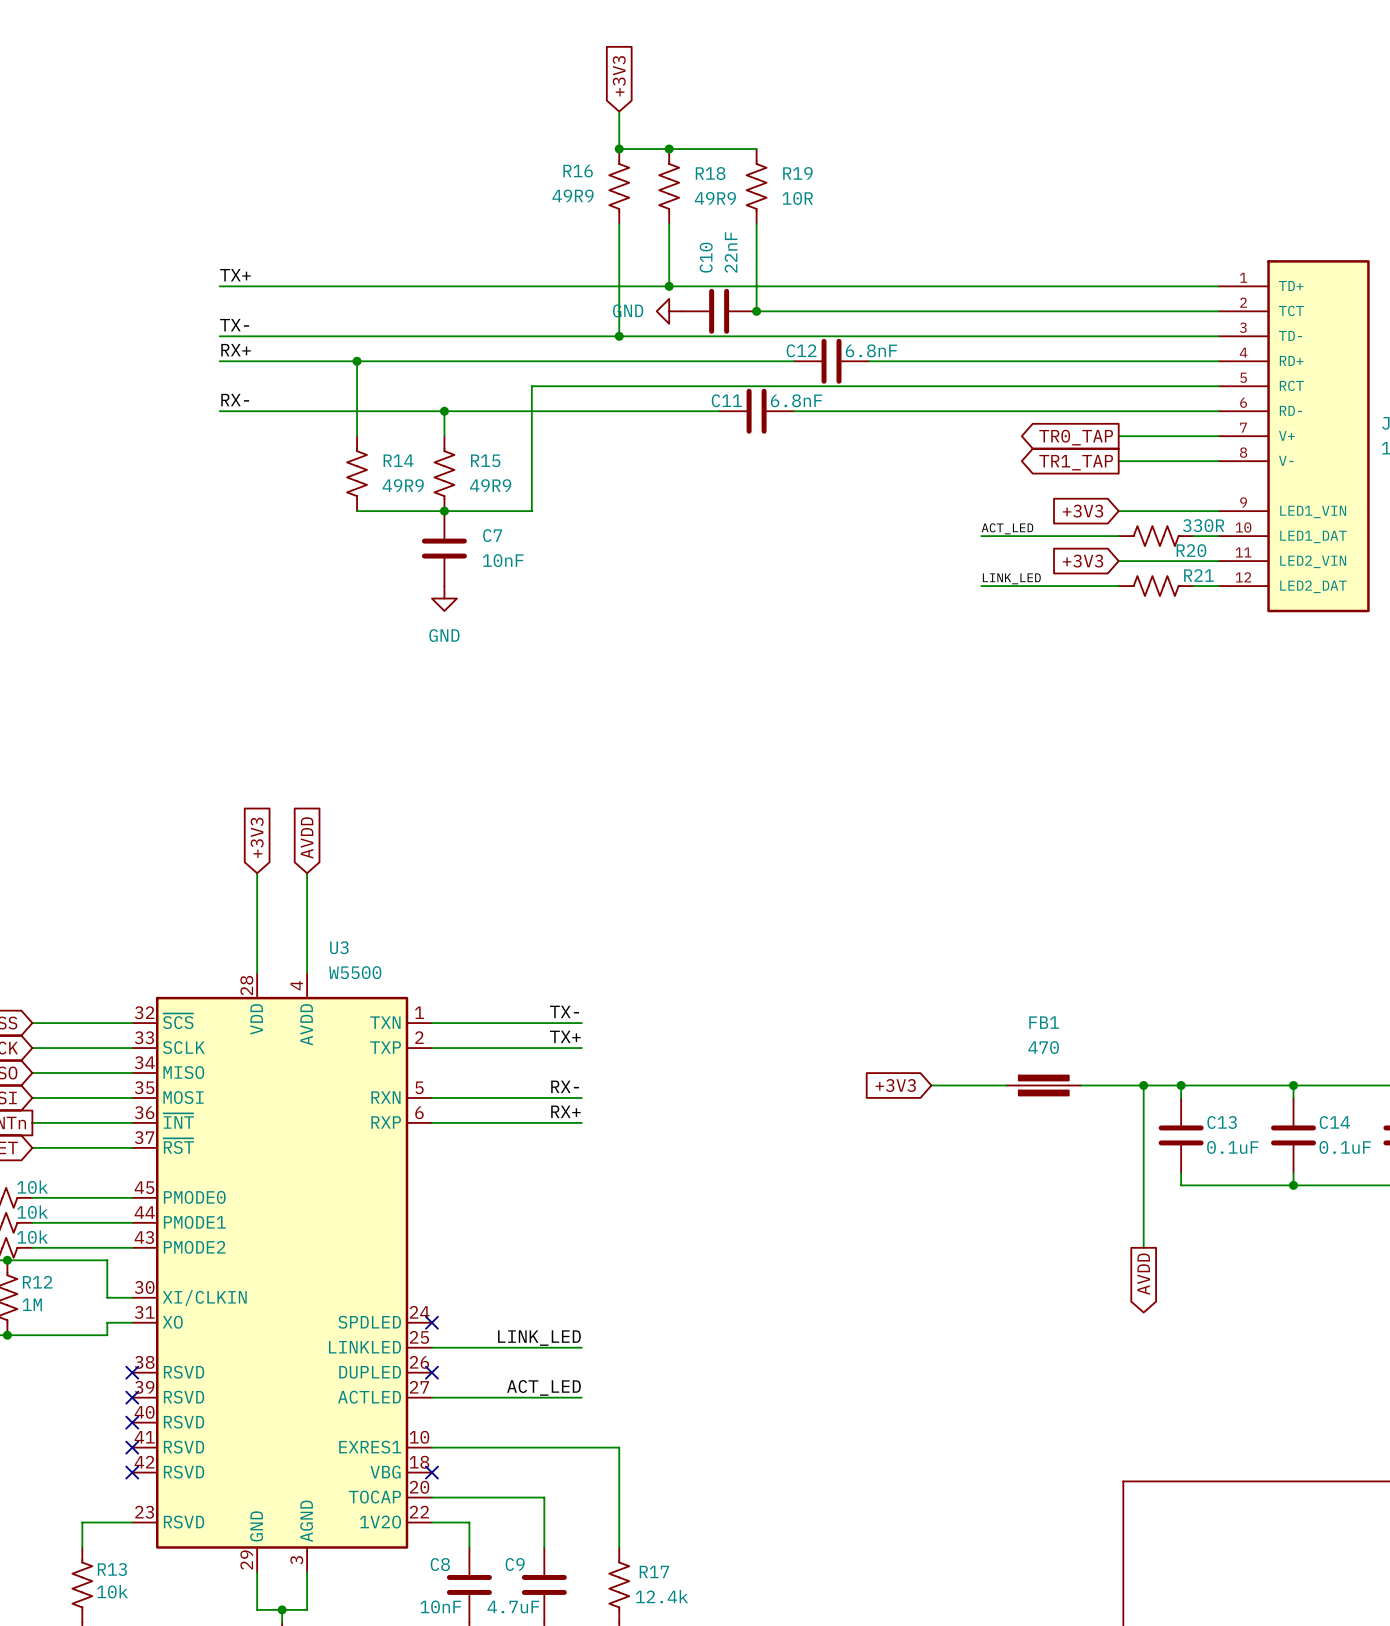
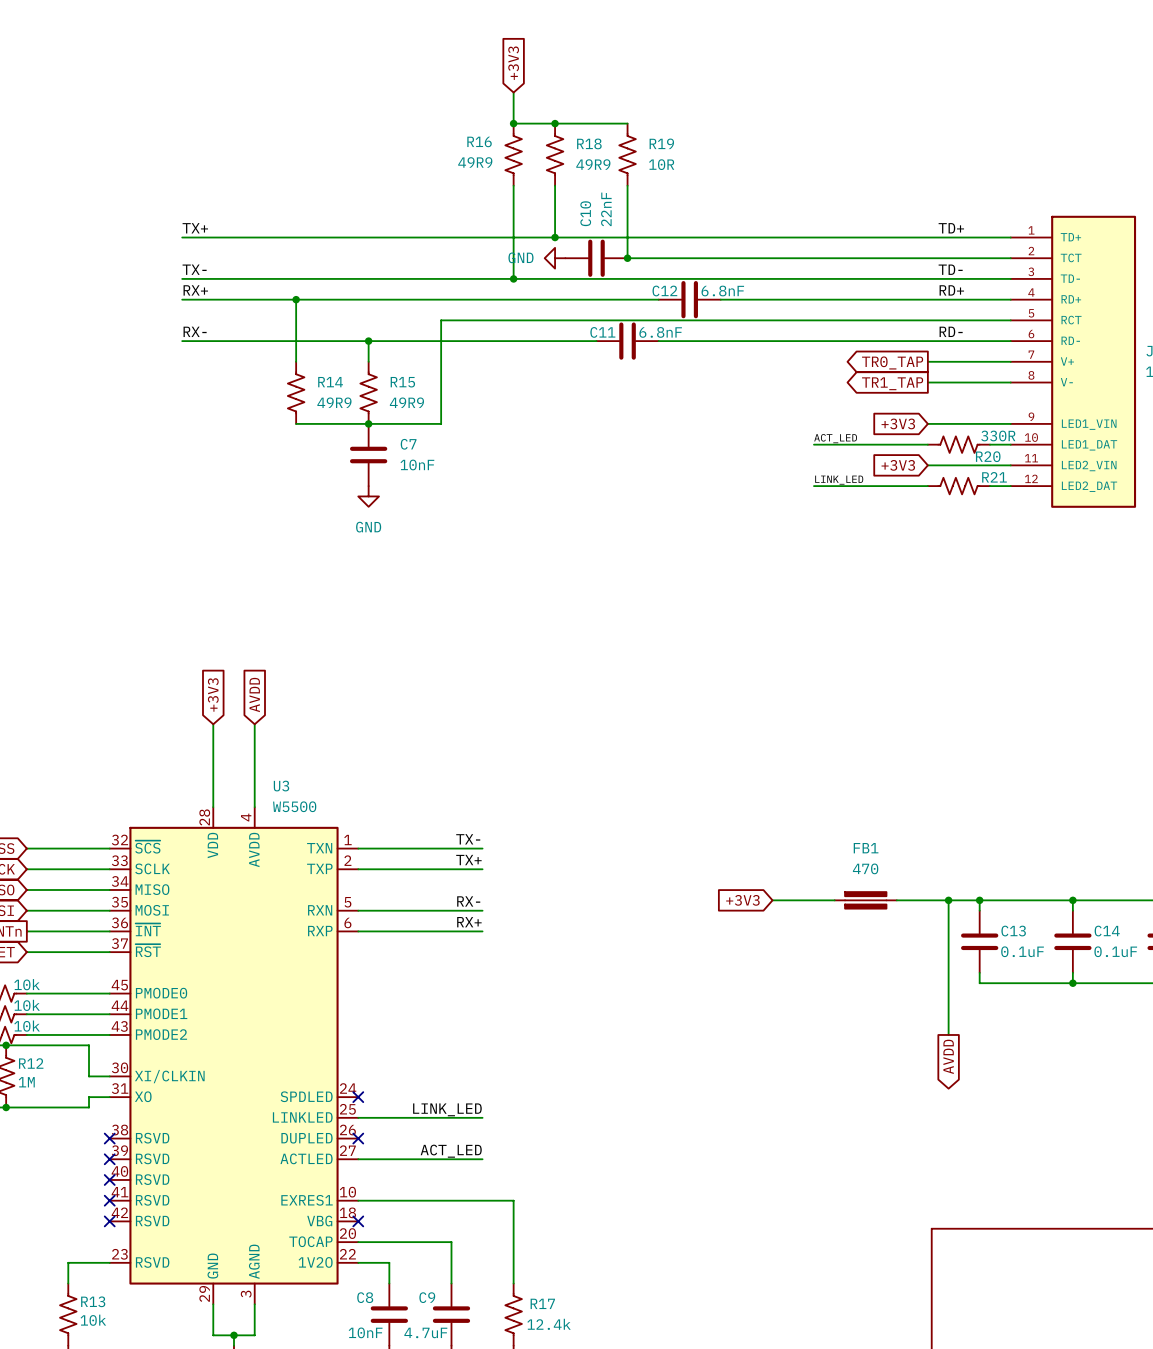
label: none -> TD+ (951, 228)
label: none -> TD- (950, 269)
label: none -> RD+ (951, 290)
label: none -> RD- (951, 331)

